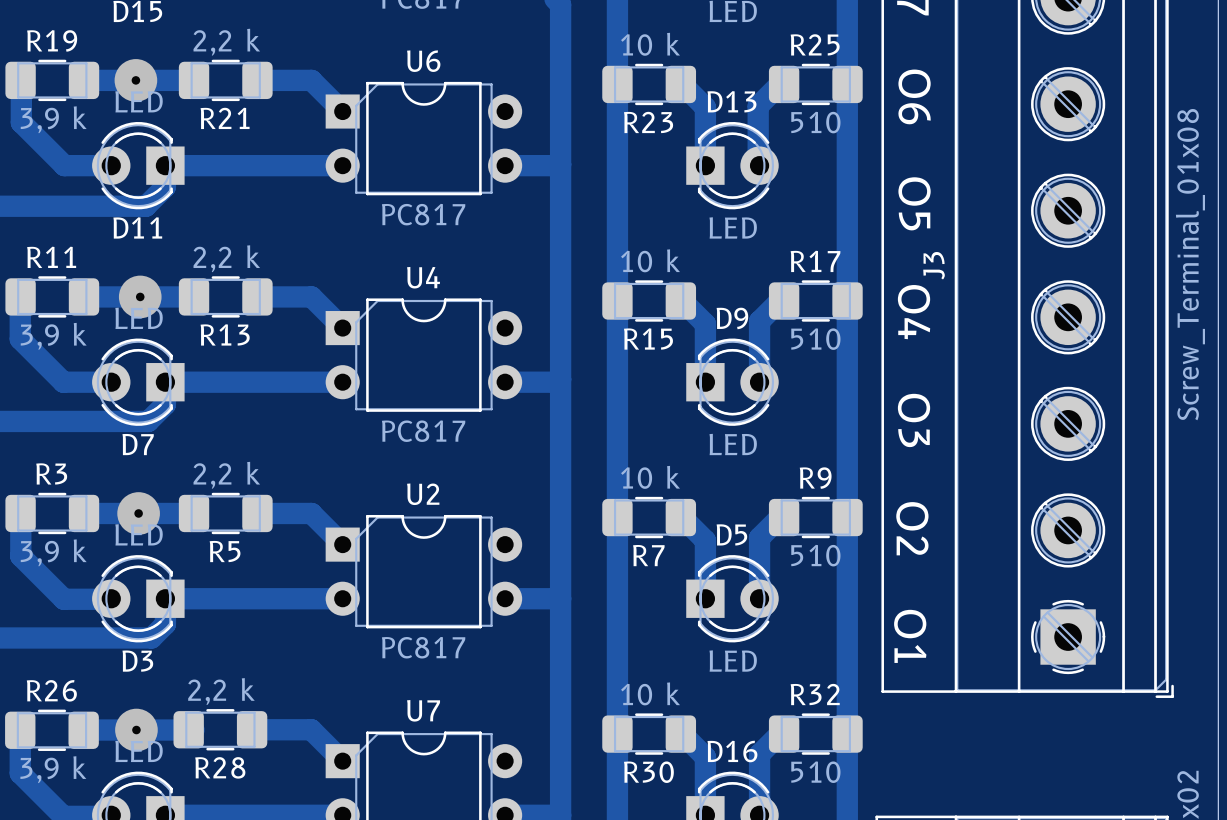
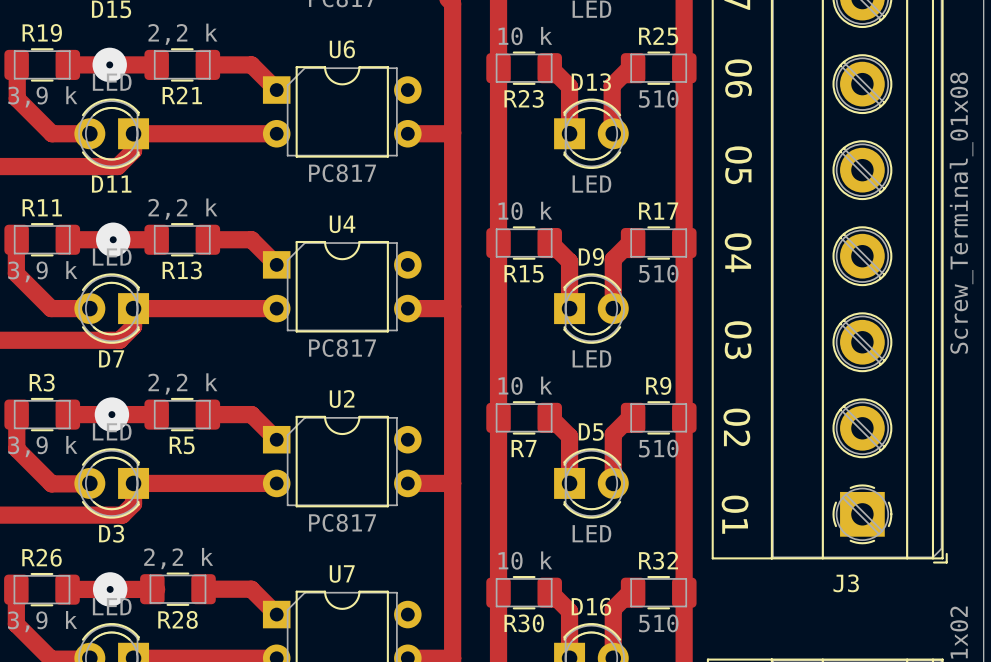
J3 name rotation: 0° (934, 265) -> 90° clockwise (846, 583)
J3 name position: J3 (934, 265) -> J3 (846, 583)

